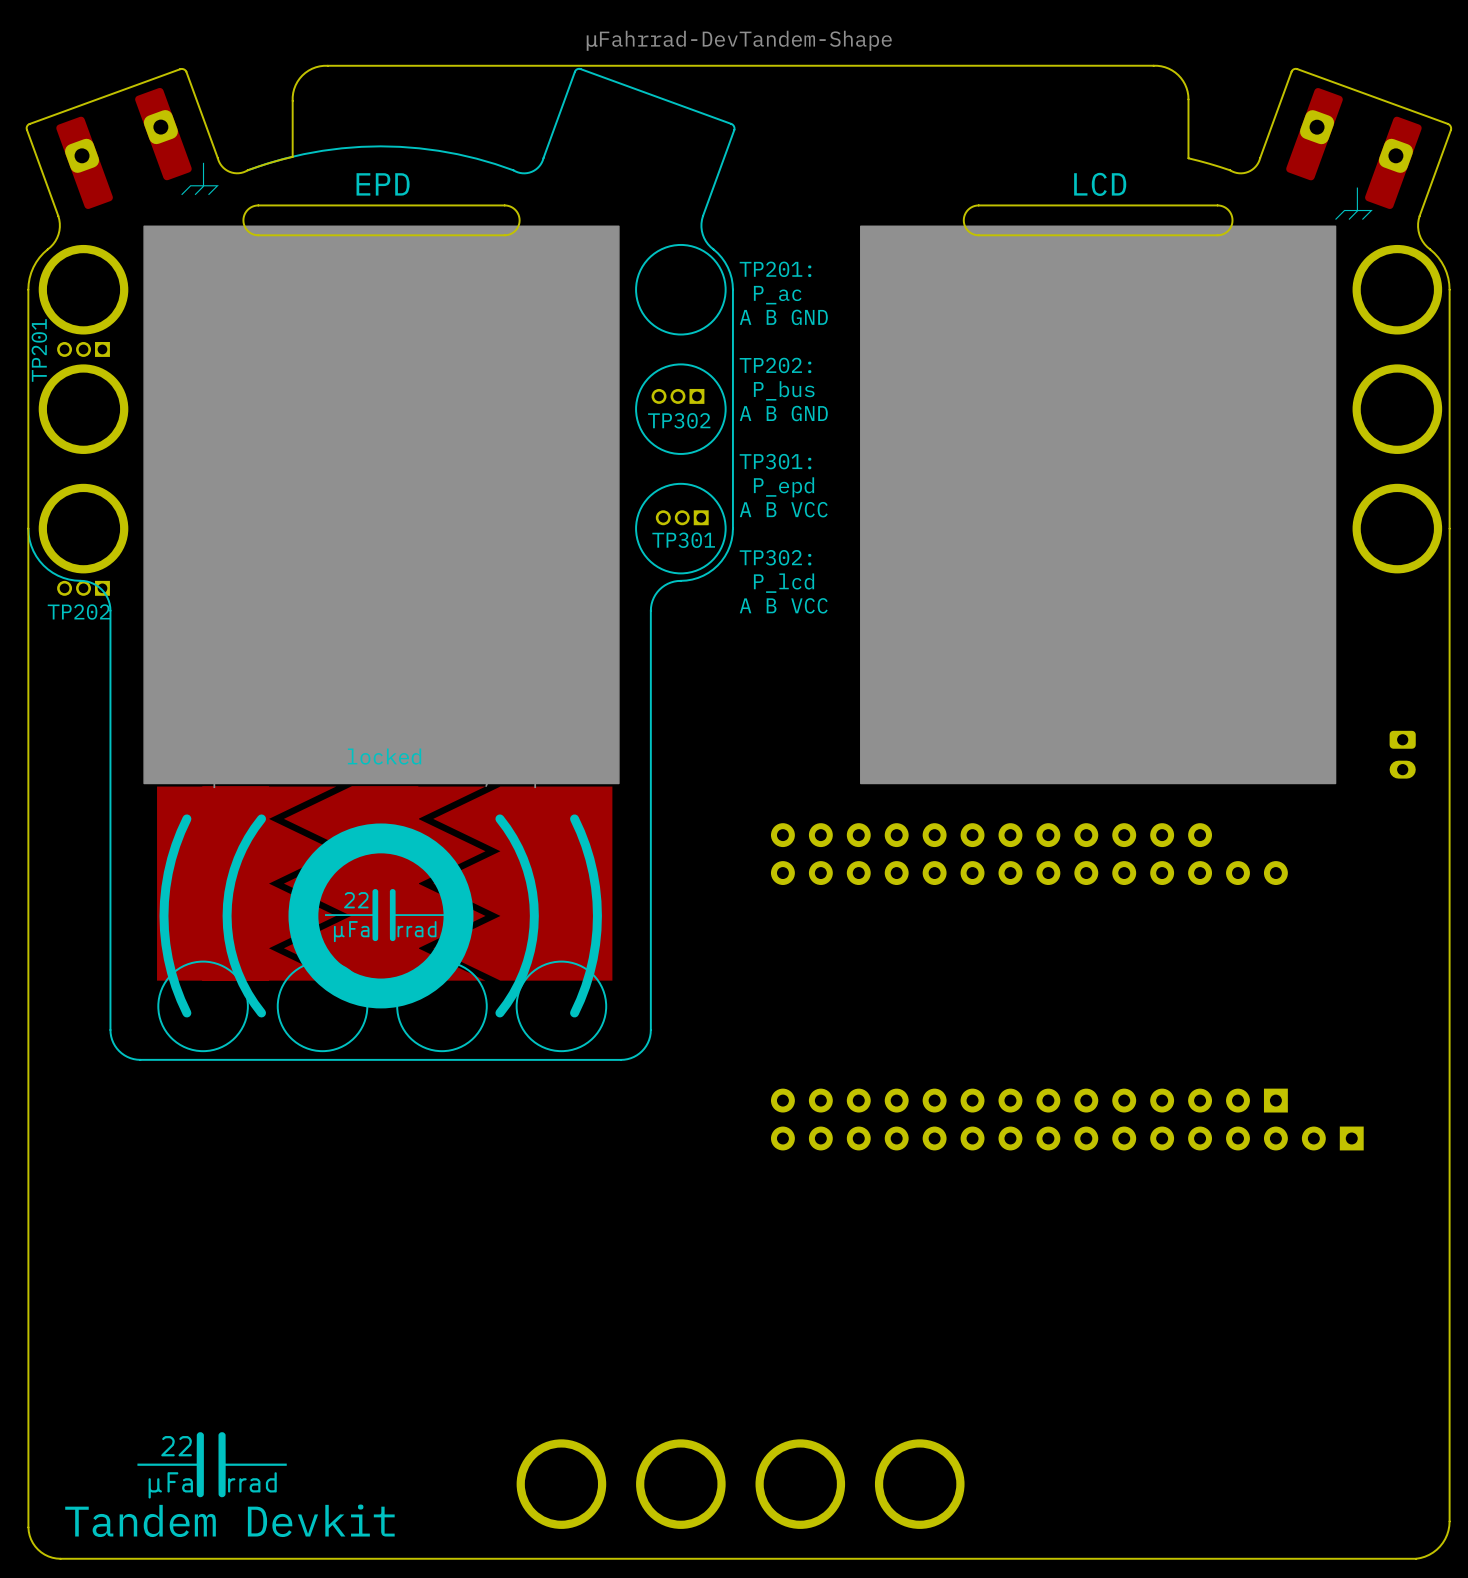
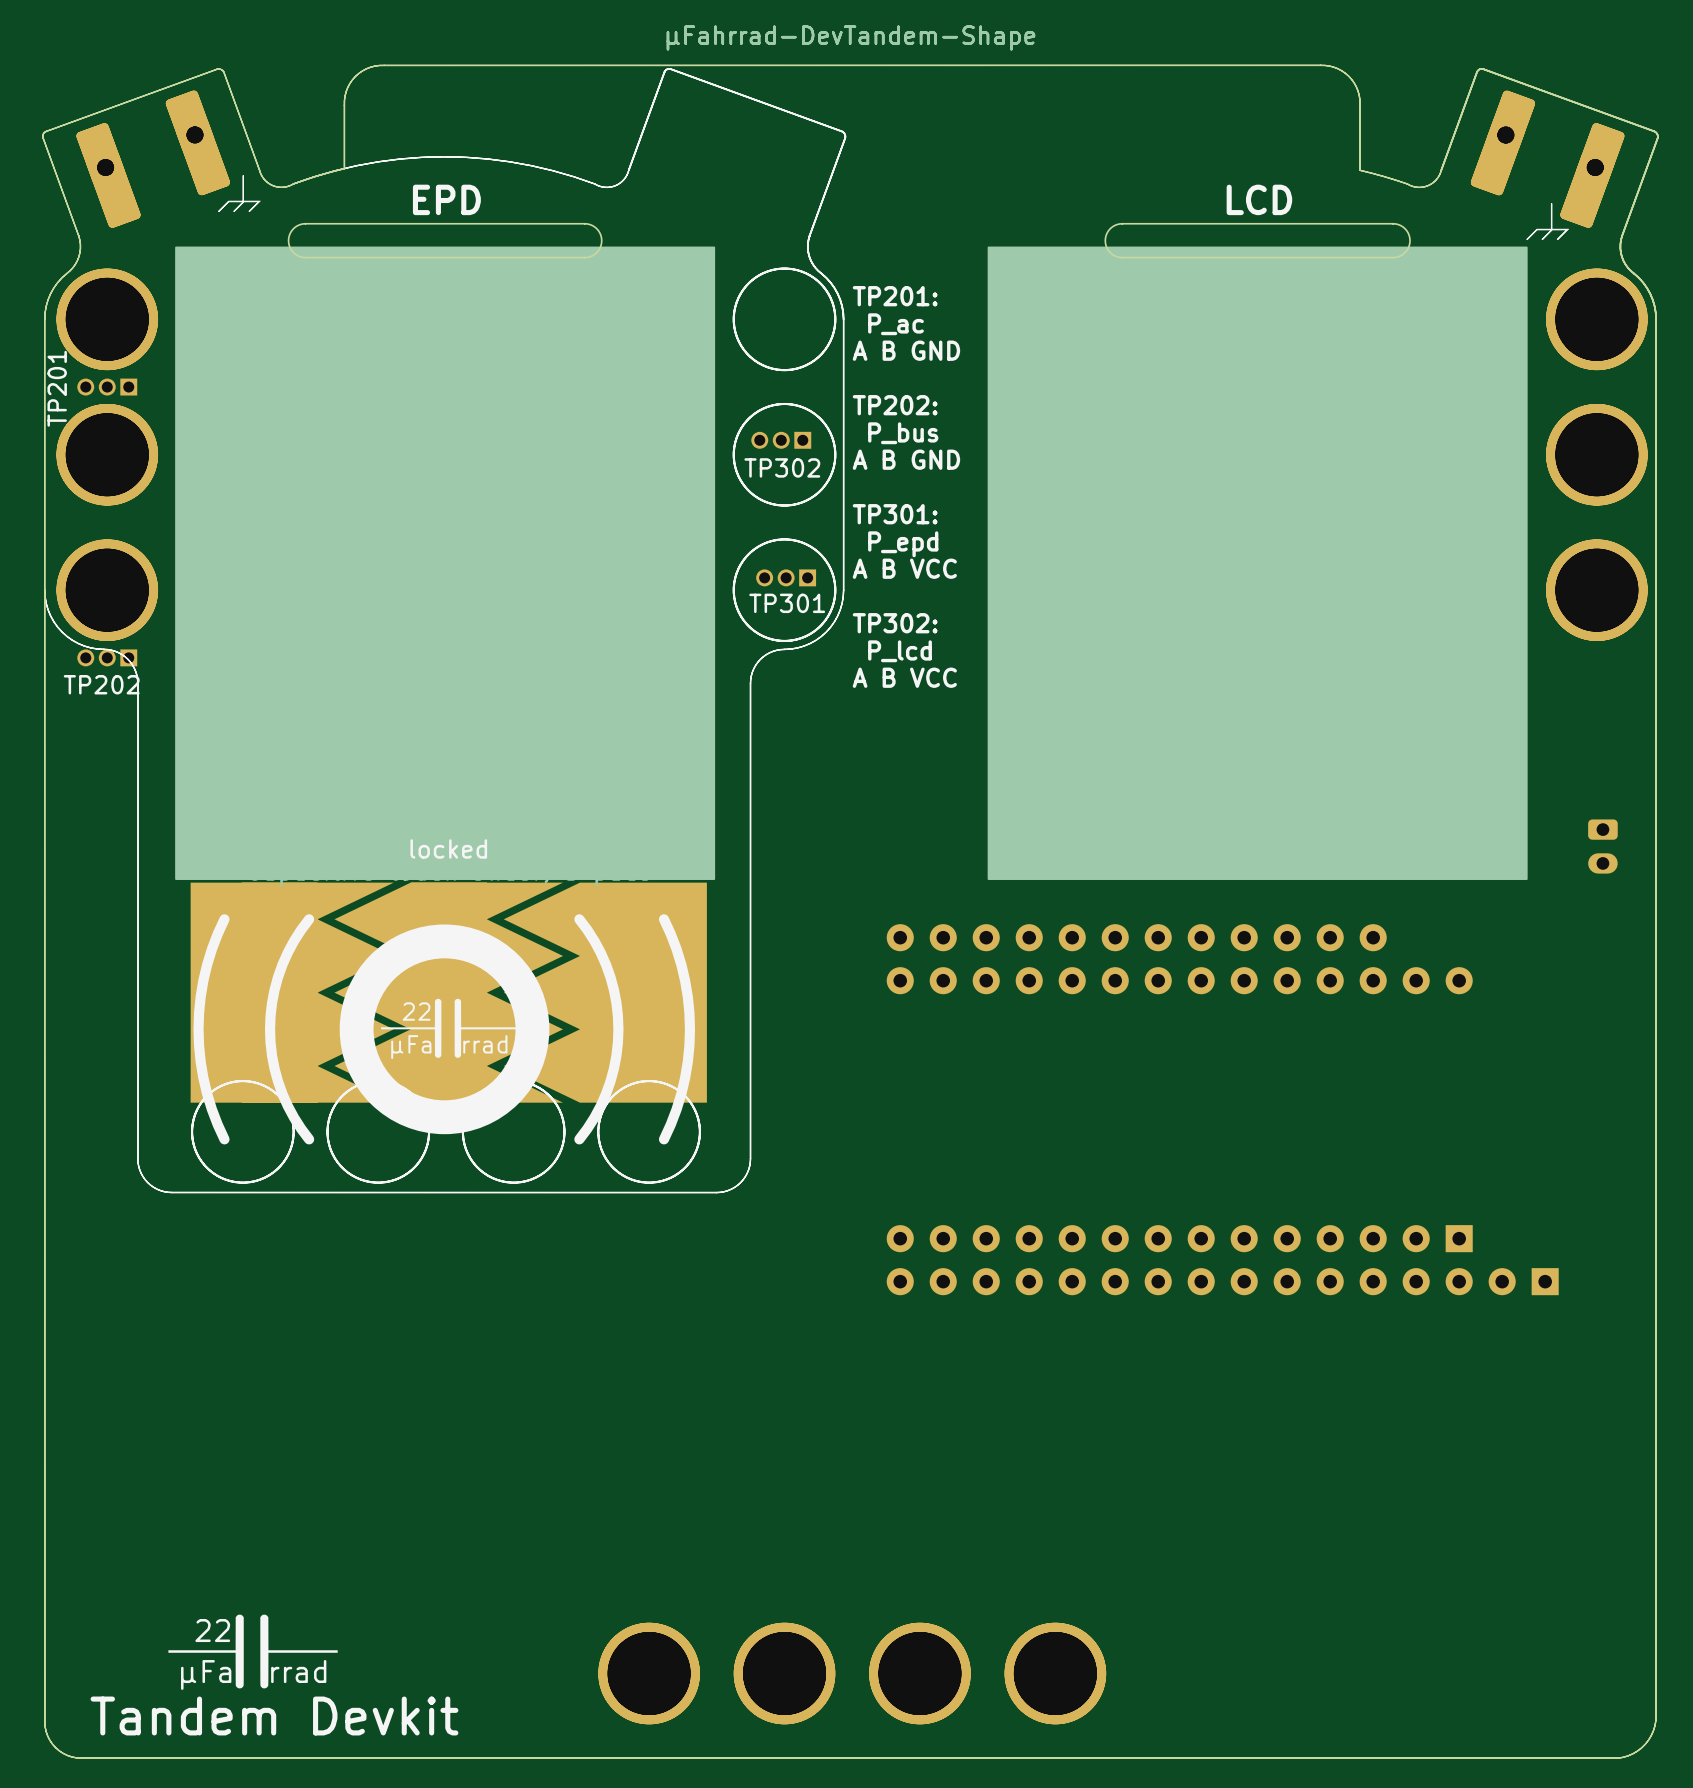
part: none -> μFahrrad-DevTandem-Shape (850, 911)

